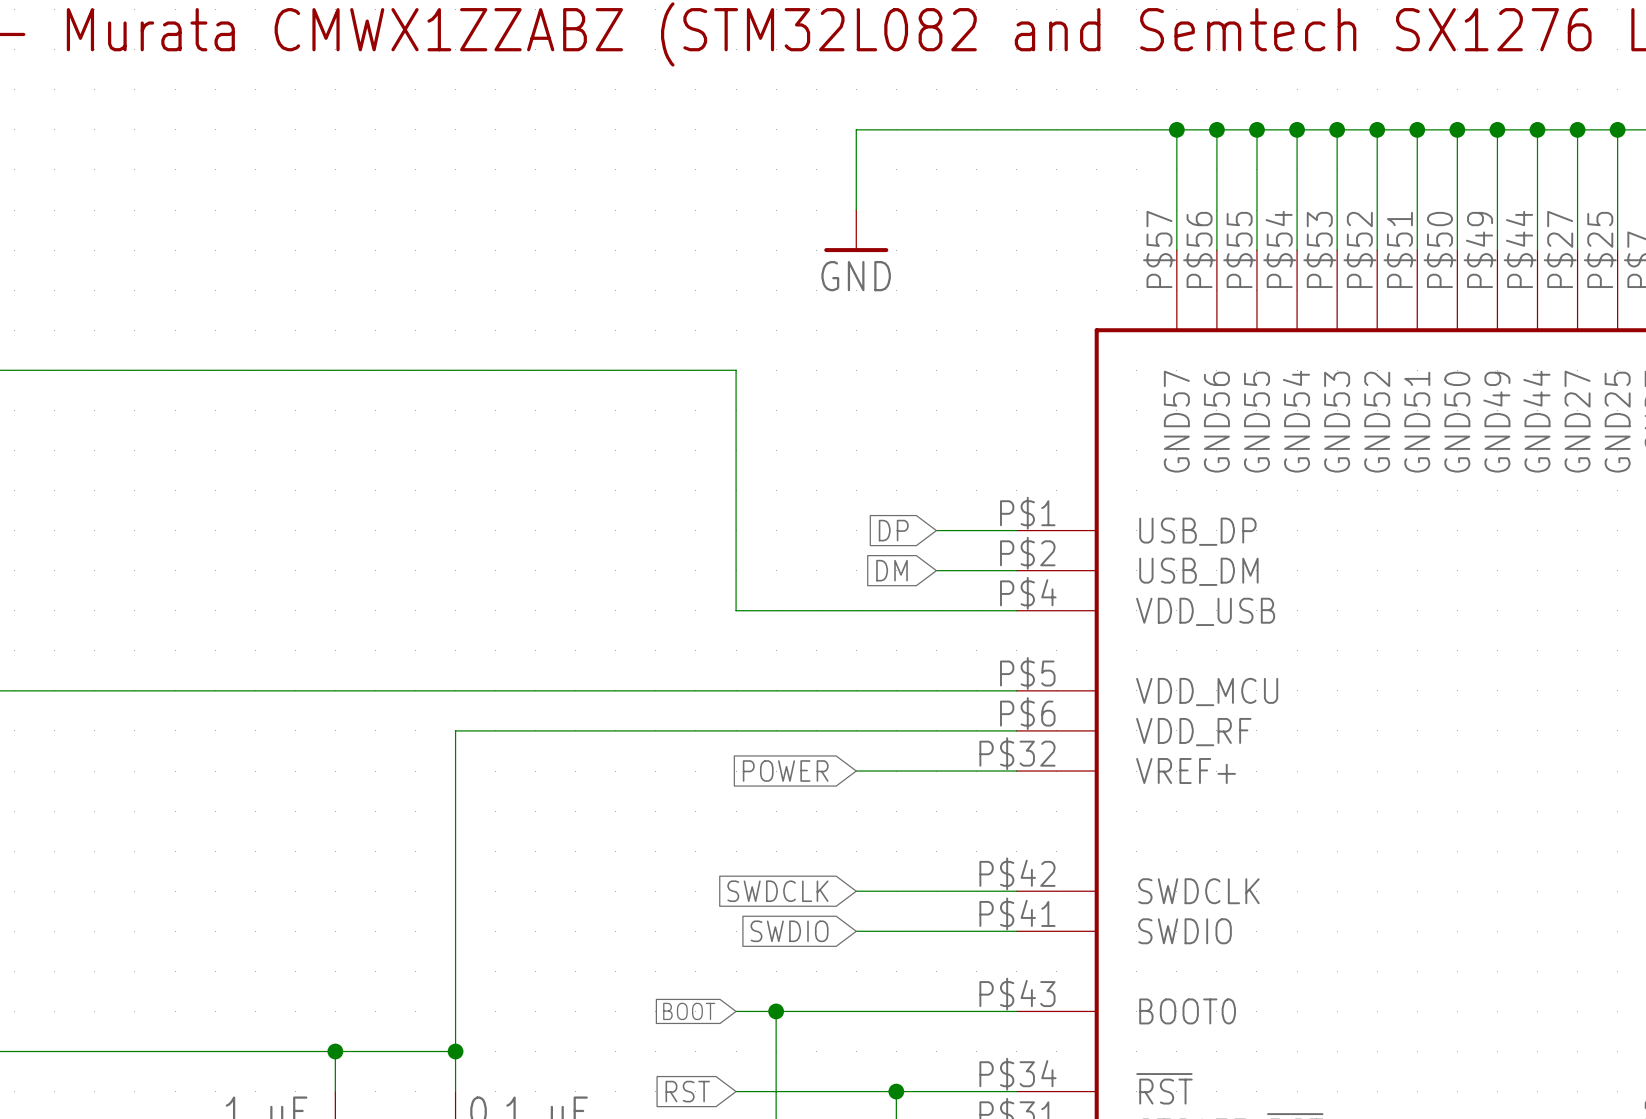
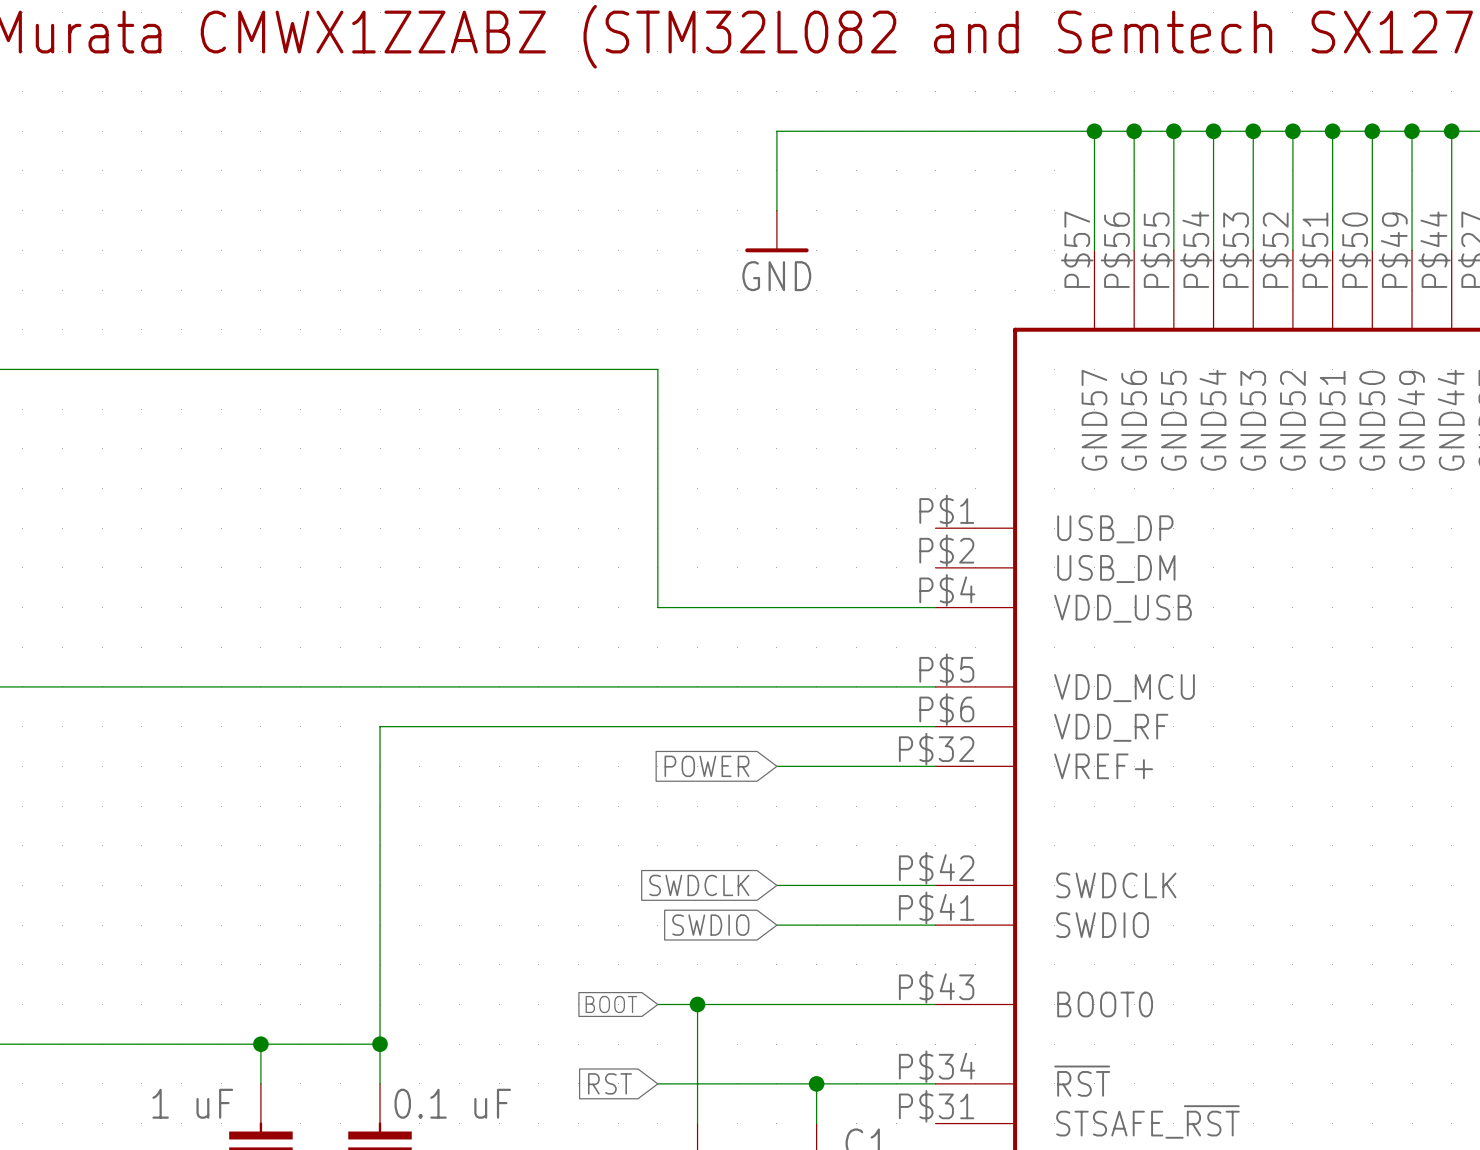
global label: DP (893, 530) -> none
wire: (936, 530) (1016, 530) -> none
global label: DM (892, 570) -> none
wire: (936, 570) (1016, 570) -> none

